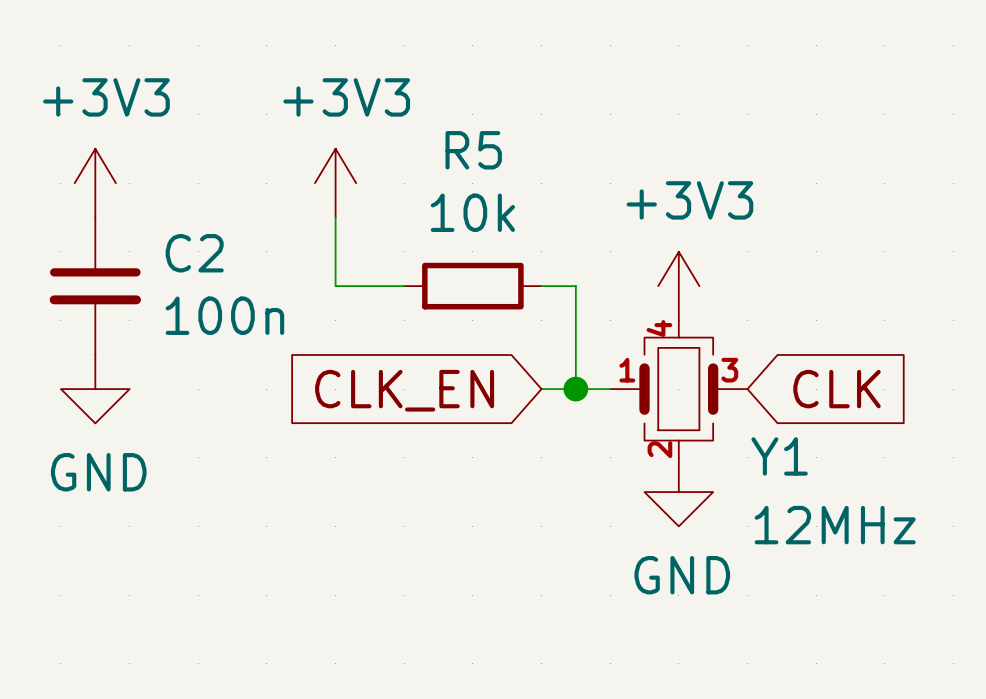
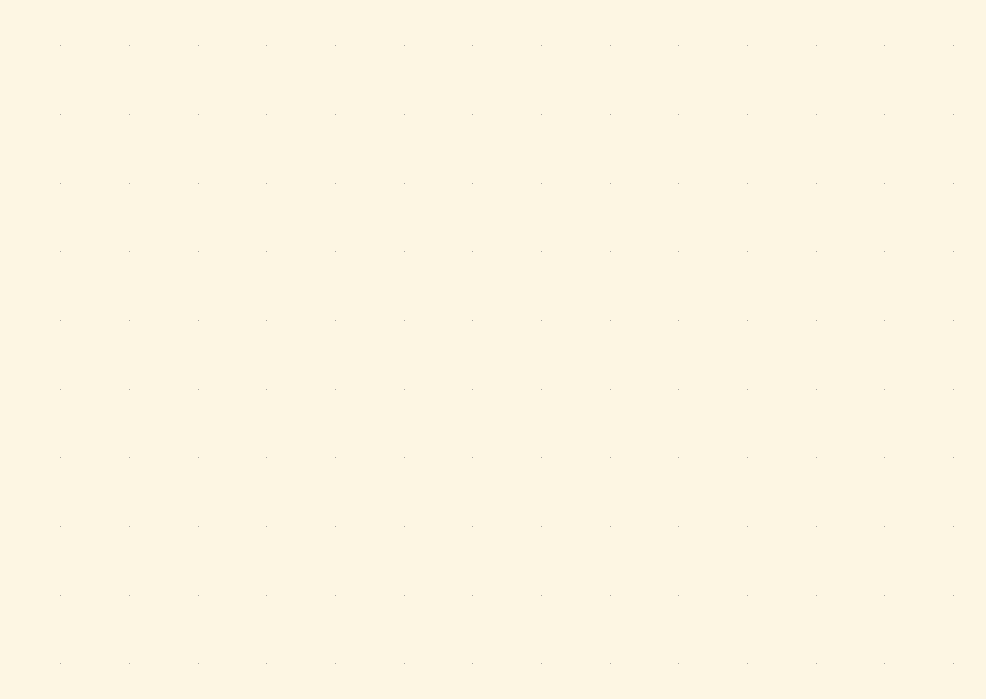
power symbol: +3V3 (95, 183) -> none
power symbol: +3V3 (335, 183) -> none
wire: (335, 217) (335, 286) (404, 286) -> none
C2: 100n (95, 286) -> none
R5: 10k (472, 286) -> none
wire: (541, 286) (575, 286) (575, 389) -> none
power symbol: +3V3 (678, 286) -> none
power symbol: GND (95, 389) -> none
wire: (541, 389) (610, 389) -> none
junction: (575, 389) -> none
Y1: 12MHz (678, 389) -> none
global label: CLK (837, 389) -> none
global label: CLK_EN (404, 390) -> none
power symbol: GND (678, 492) -> none

